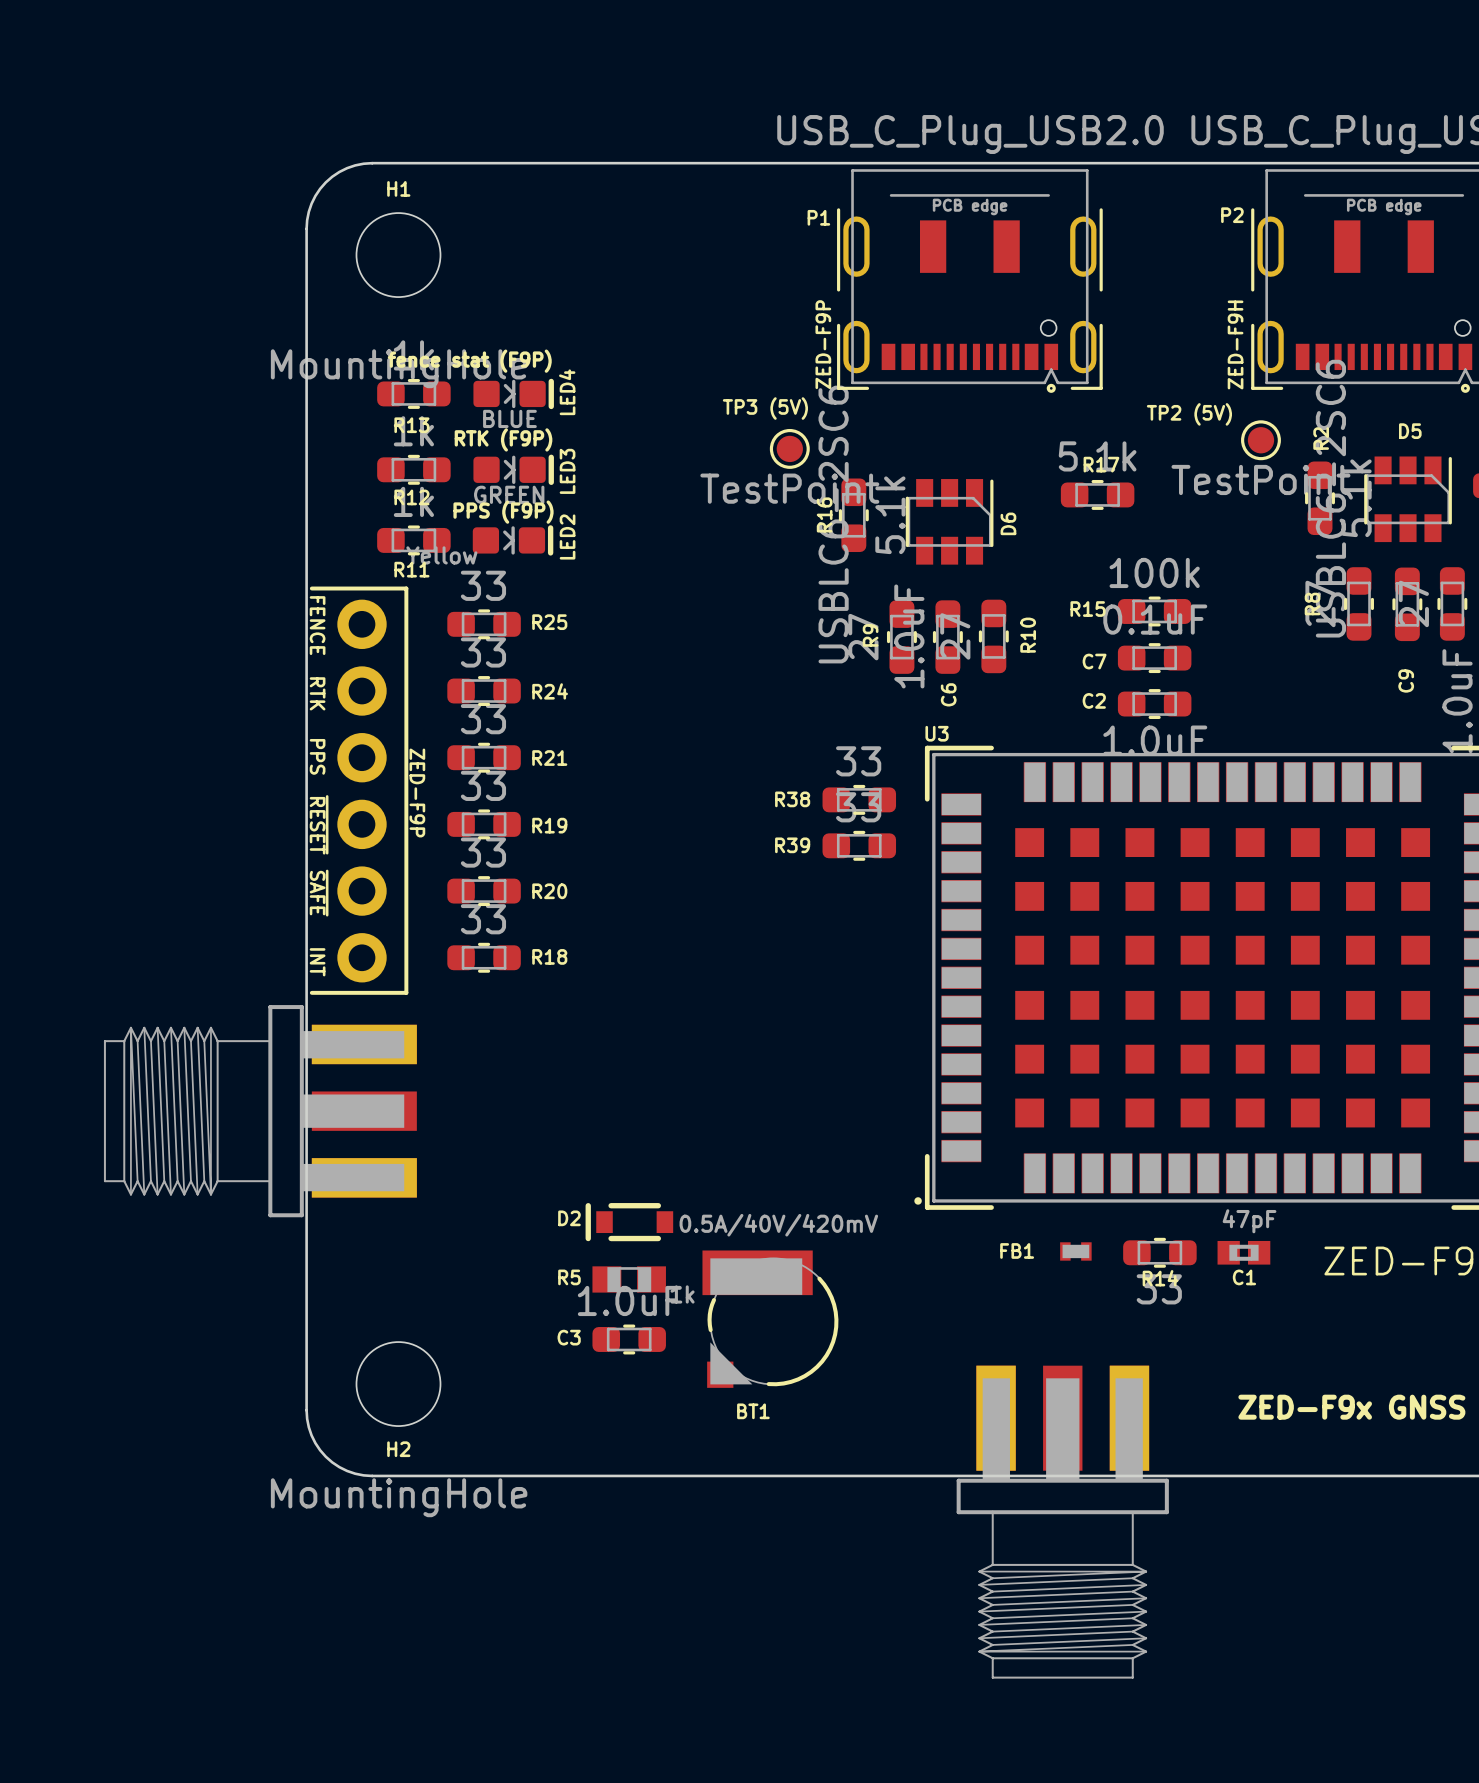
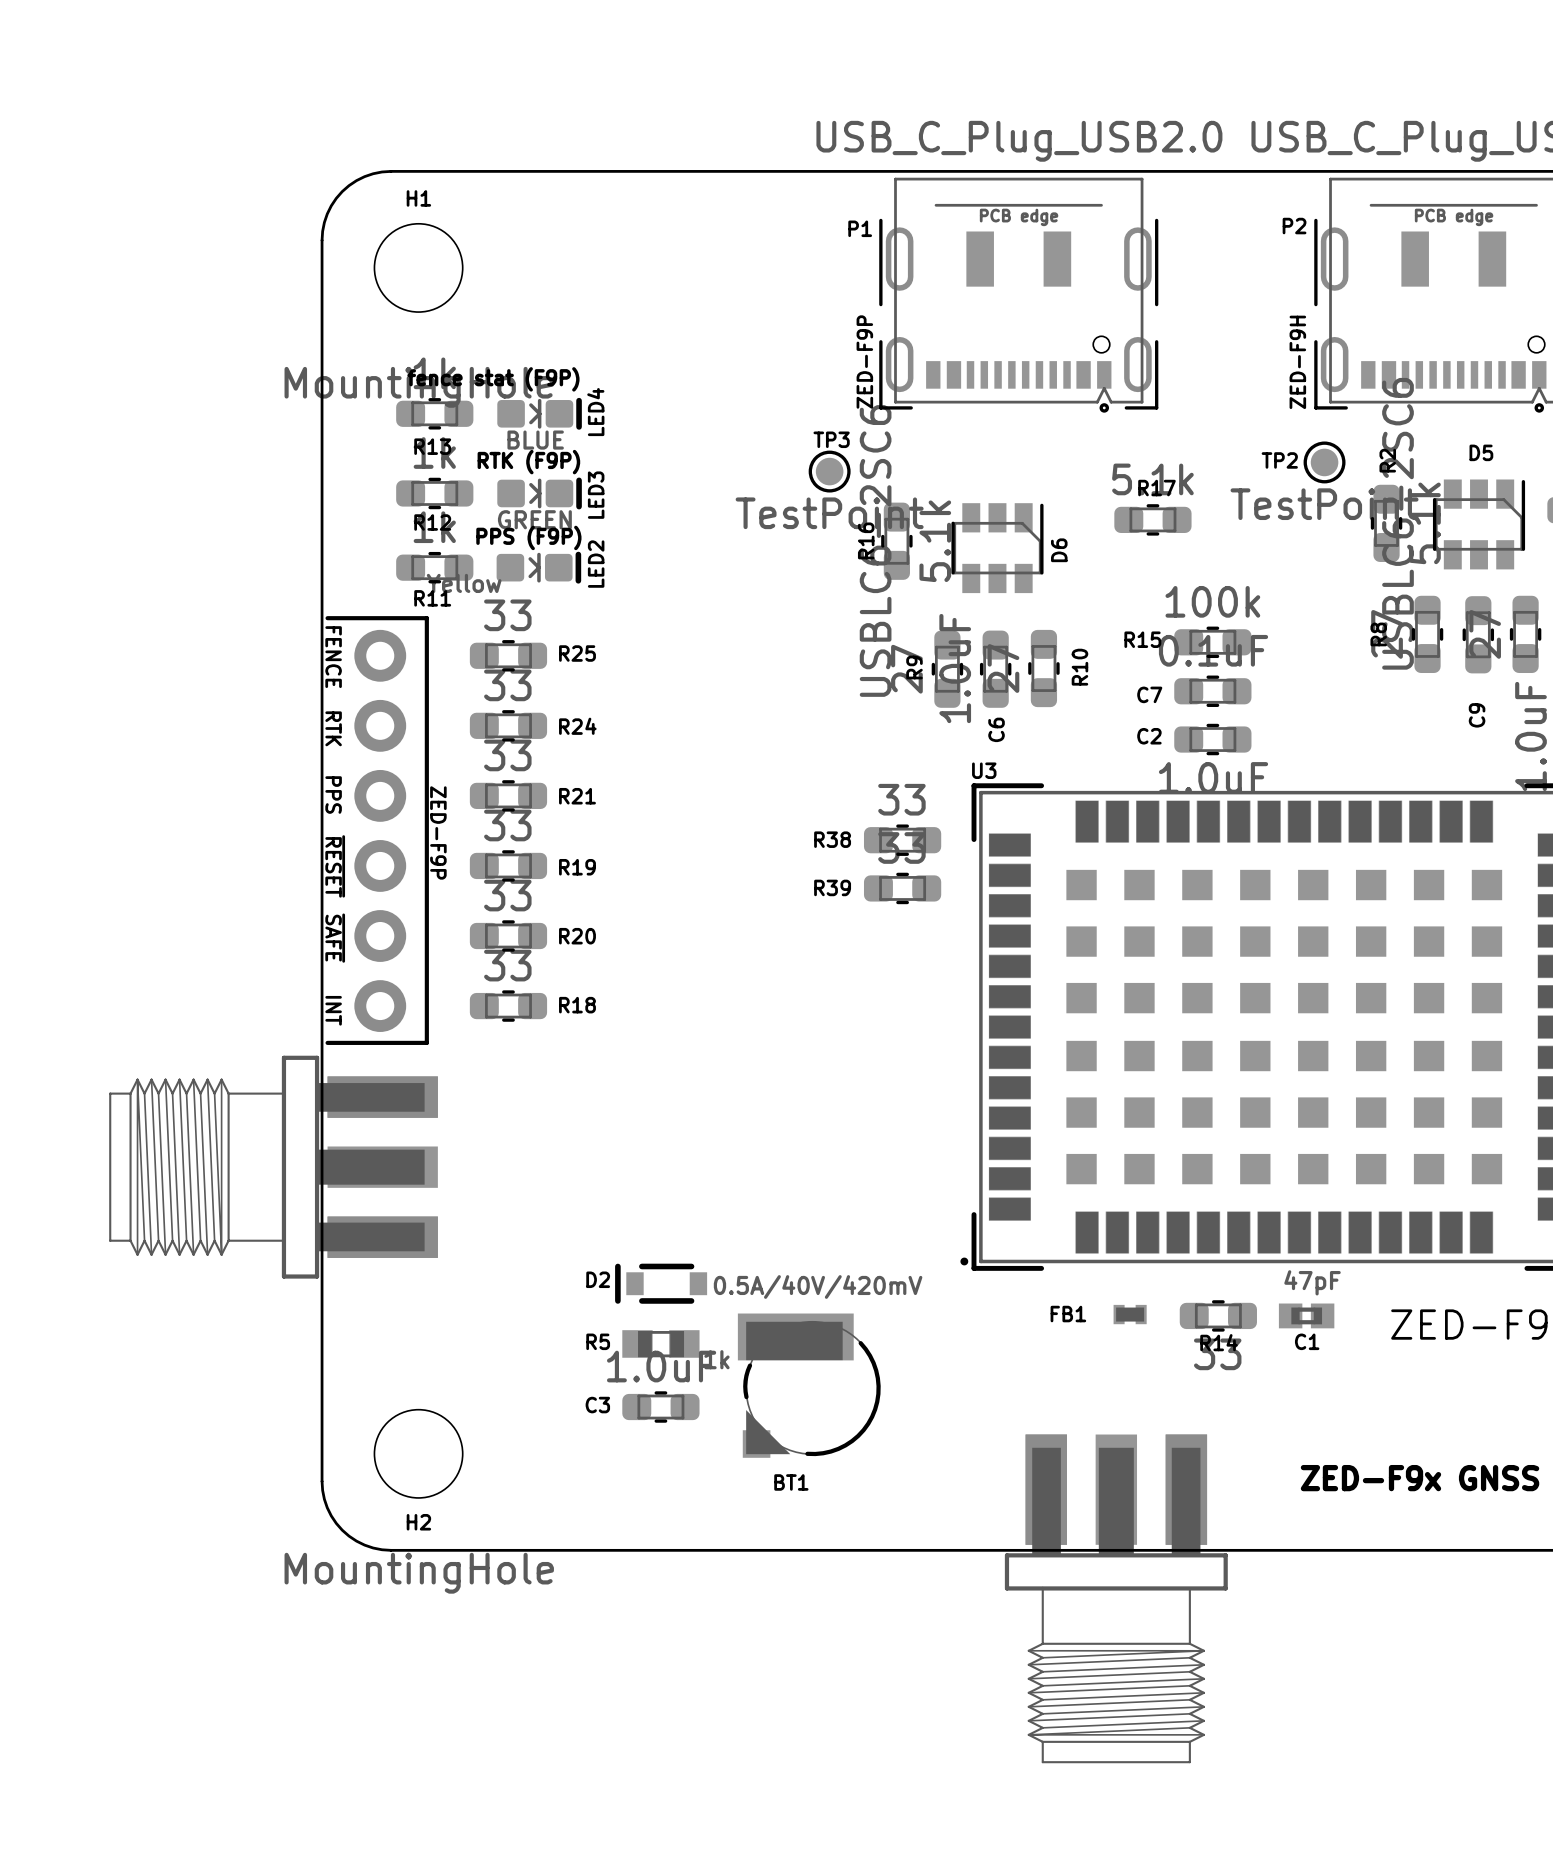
TP3 (5V) name: TP3 (5V) (765, 408) -> TP3 (831, 439)
TP2 (5V) name: TP2 (5V) (1189, 414) -> TP2 (1279, 460)

